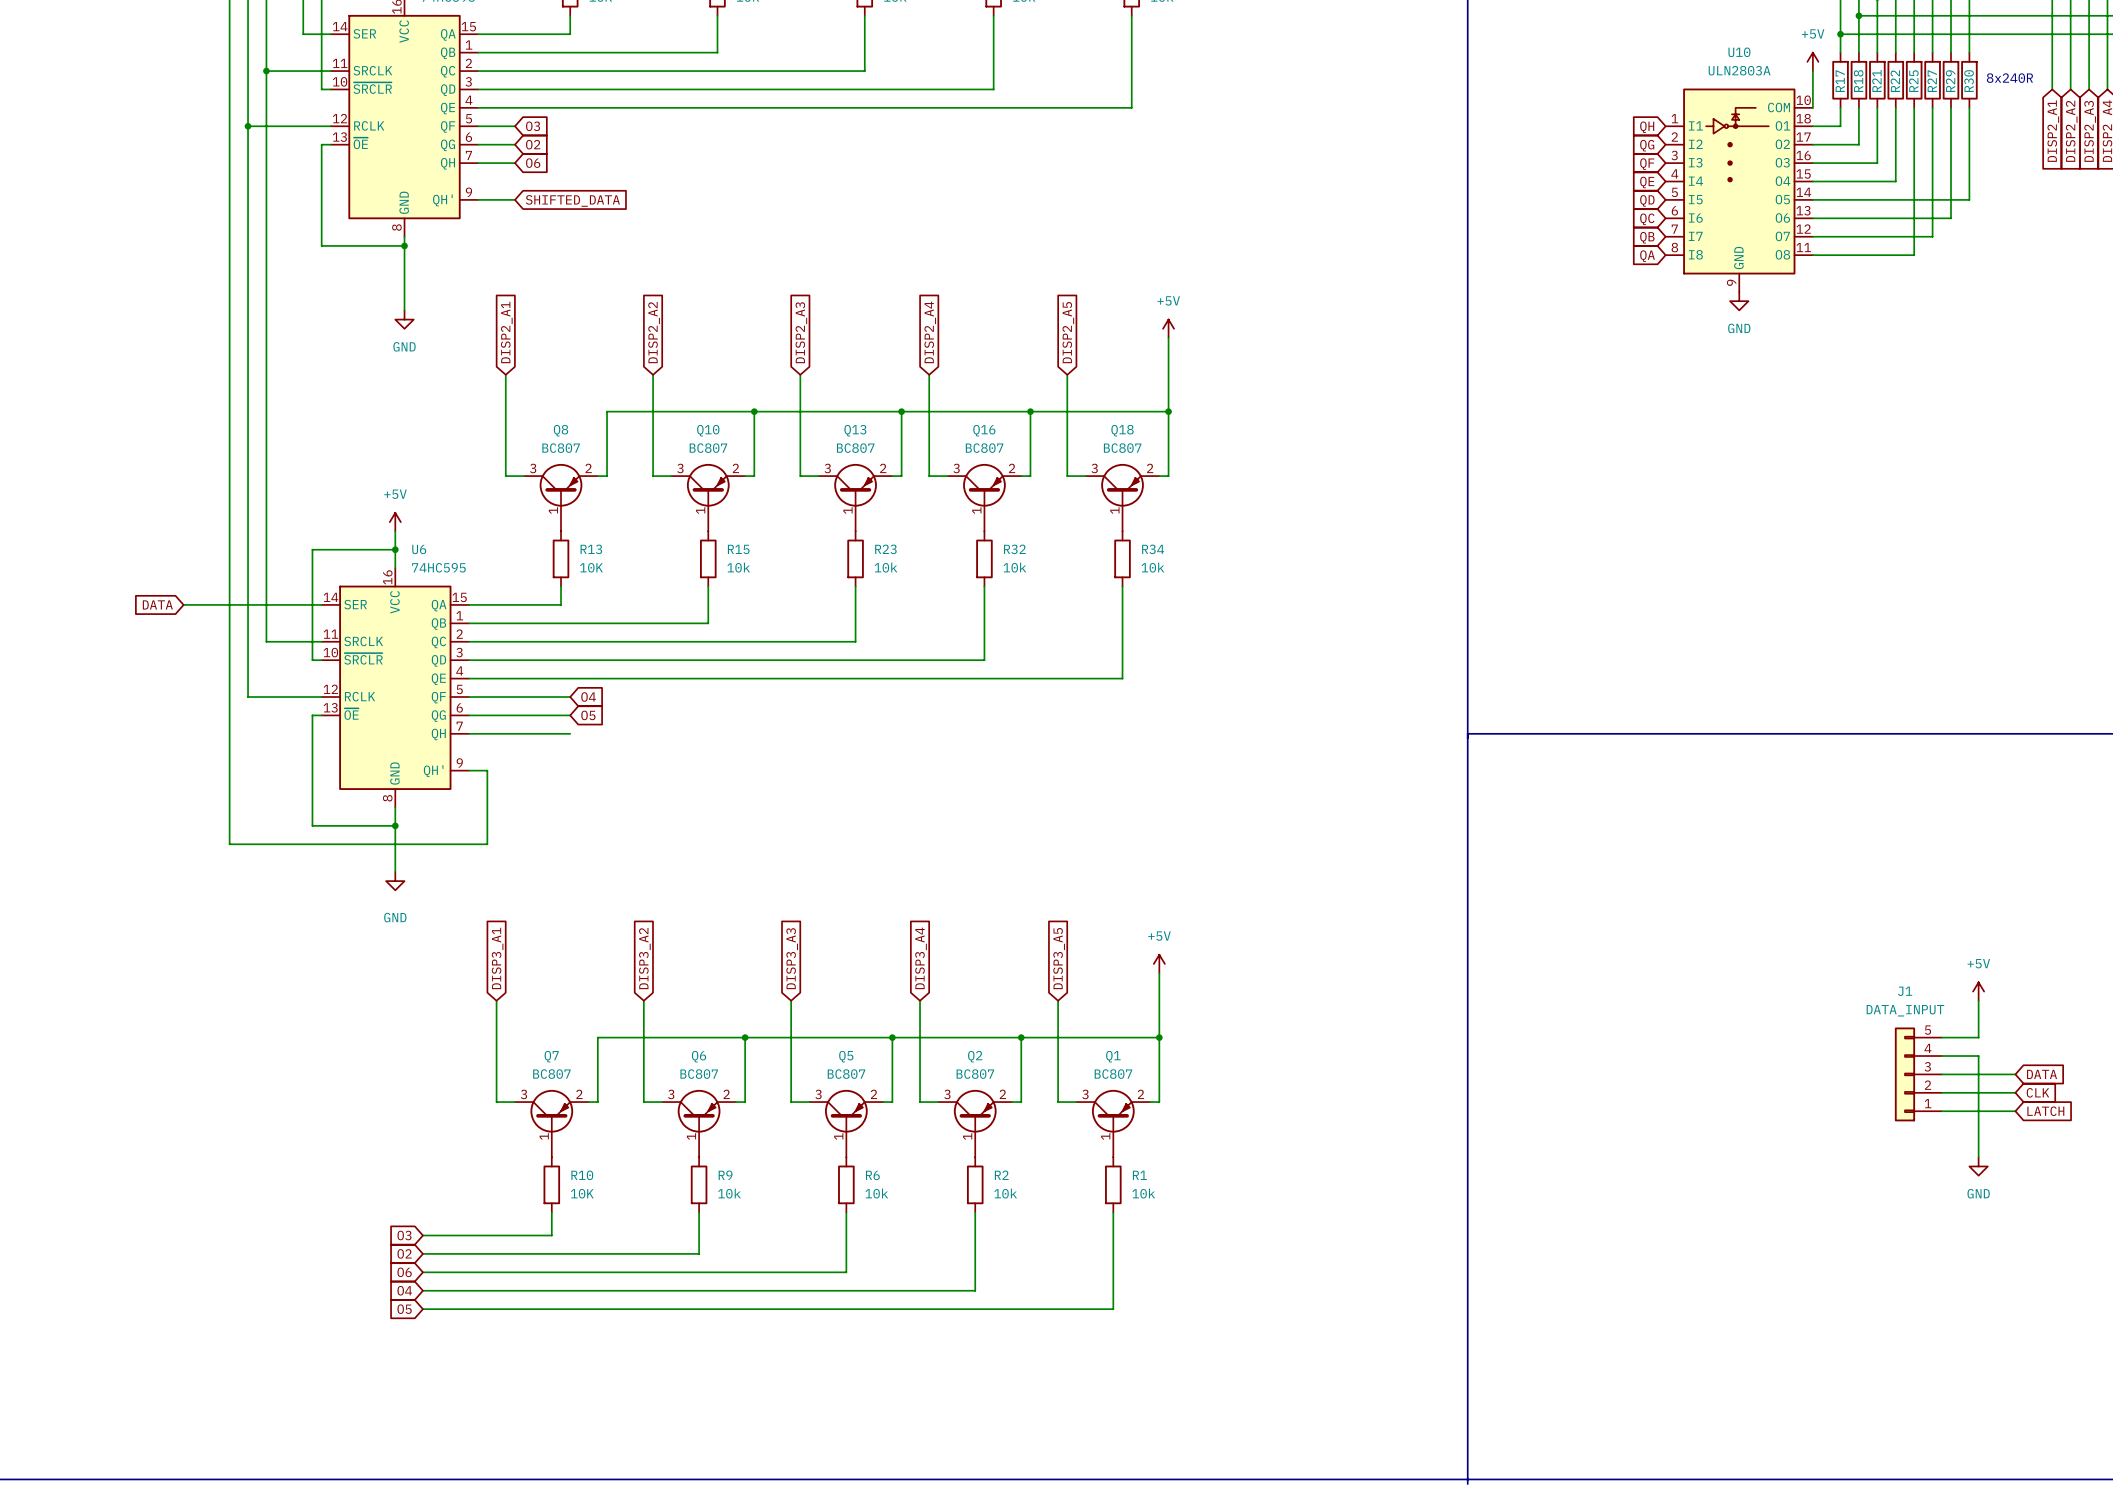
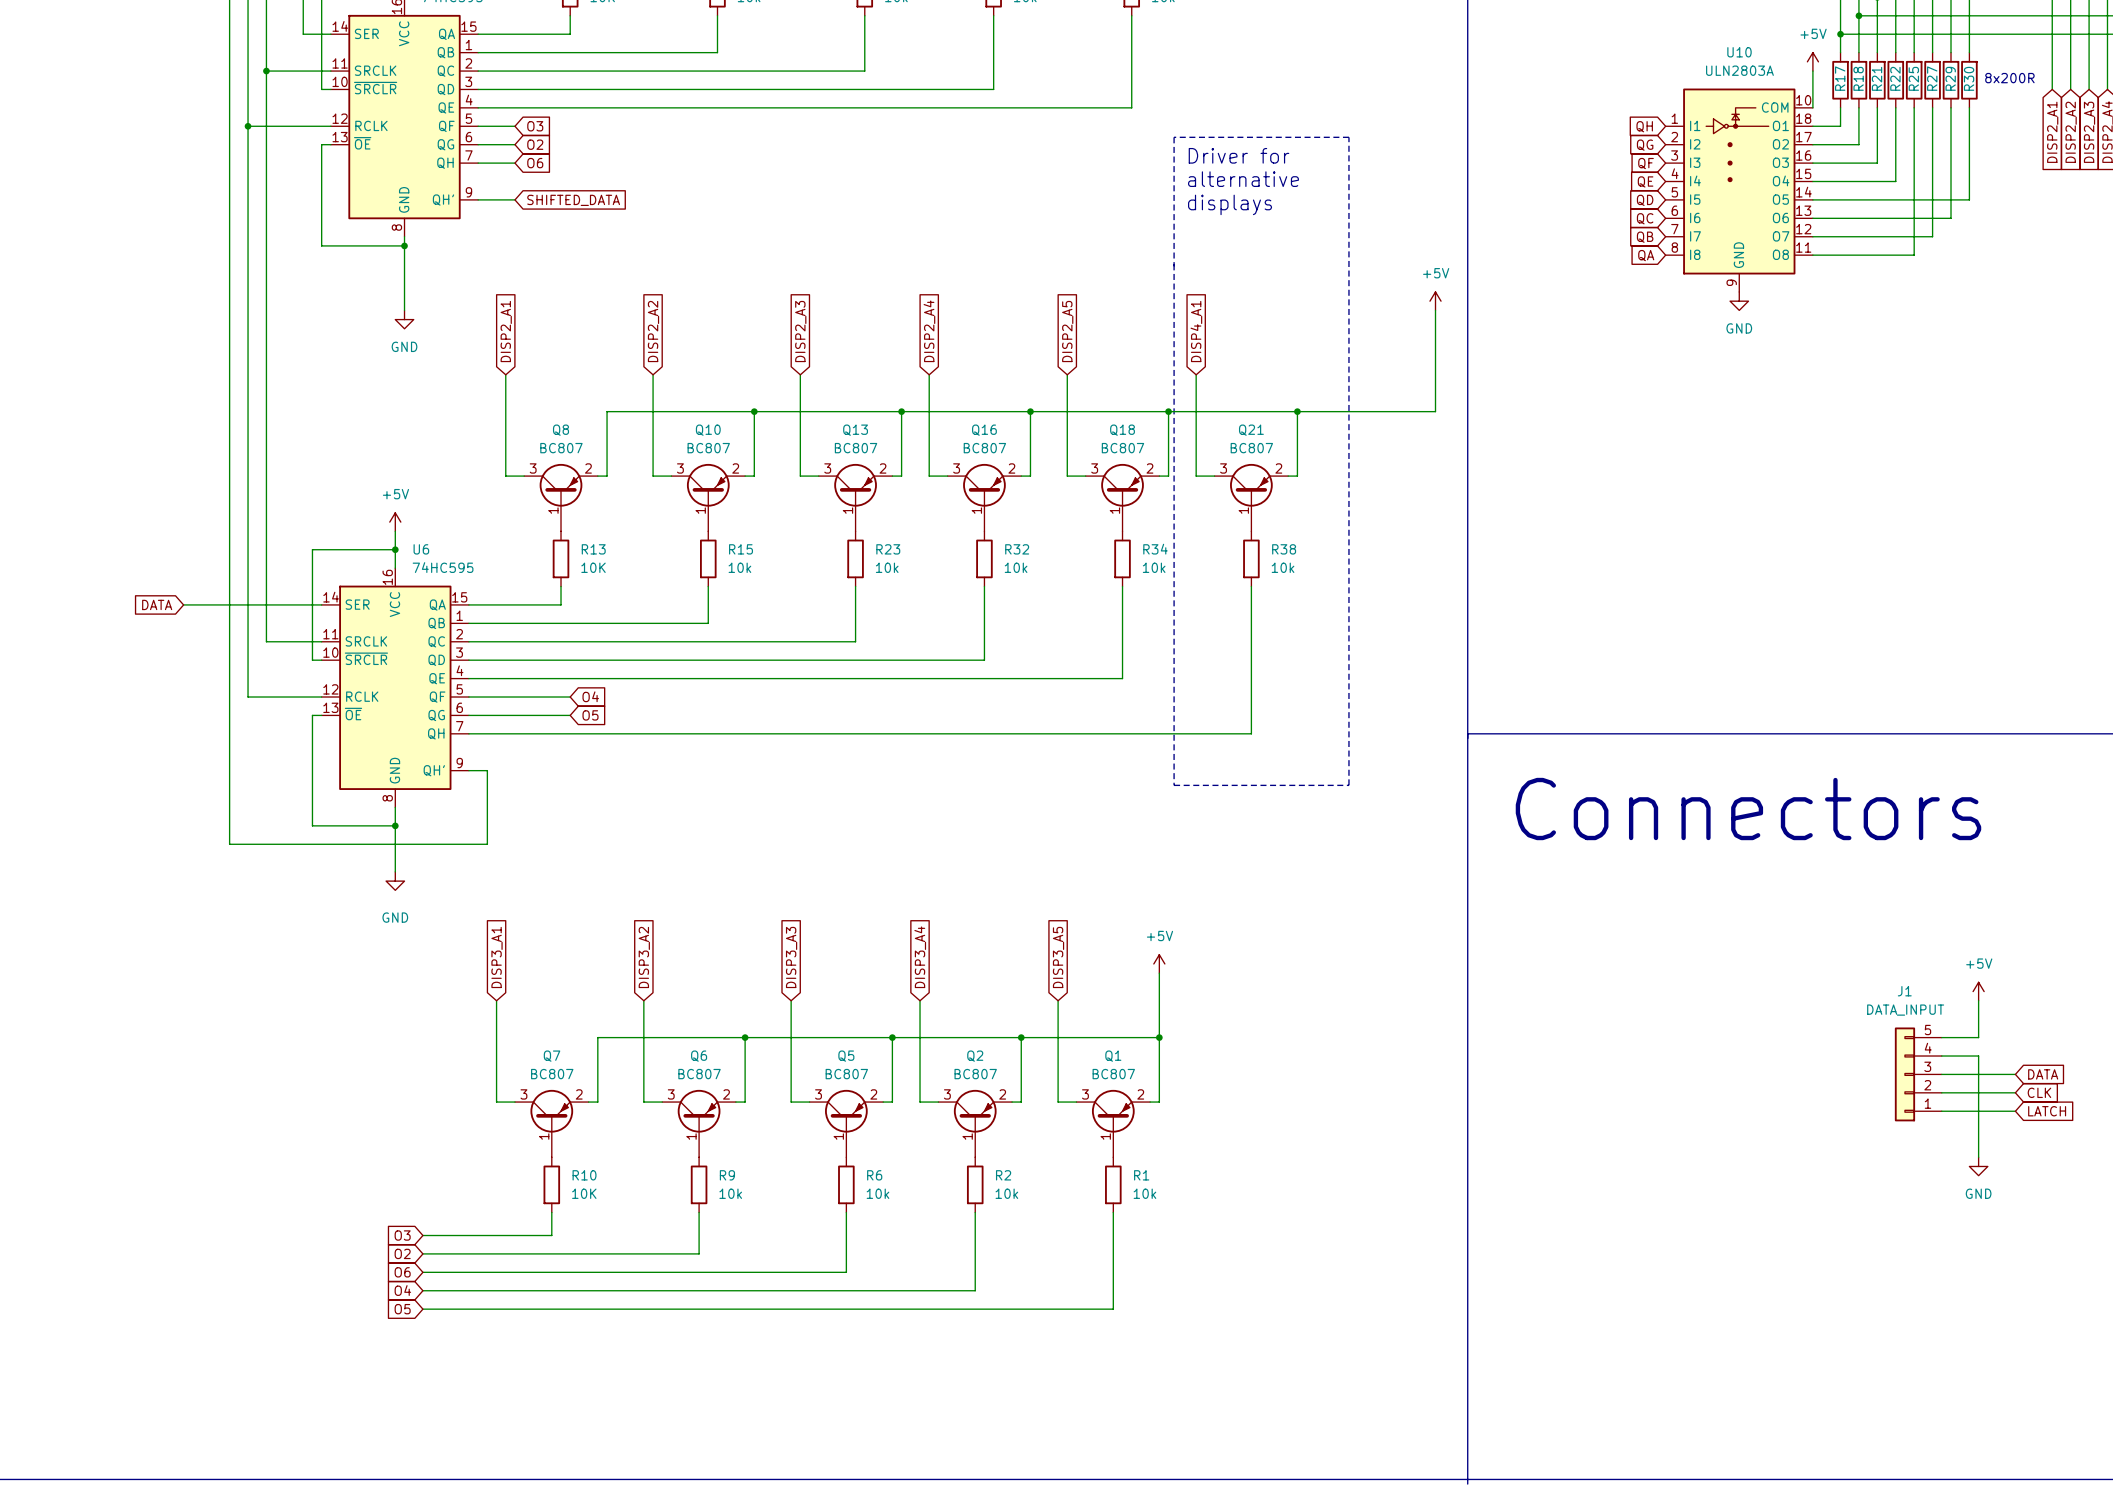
text: 8x240R (2009, 78) -> 8x200R (2009, 78)
line: none -> (1174, 137) (1348, 137) (1348, 785) (1174, 785) (1174, 137)
text: none -> Driver for (1239, 155)
text: none -> alternative (1243, 179)
text: none -> displays (1230, 204)
power symbol: none -> +5V (1435, 301)
power symbol: +5V (1168, 328) -> none
global label: none -> DISP4_A1 (1196, 331)
wire: (1168, 337) (1168, 411) -> (1435, 310) (1435, 411) (1168, 411)
wire: none -> (1196, 374) (1196, 476) (1214, 476)
wire: none -> (1297, 411) (1297, 476) (1288, 476)
junction: none -> (1297, 411)
Q21: none -> BC807 (1251, 497)
R38: none -> 10k (1251, 558)
wire: none -> (1251, 586) (1251, 733) (570, 733)
text: none -> Connectors (1748, 809)

